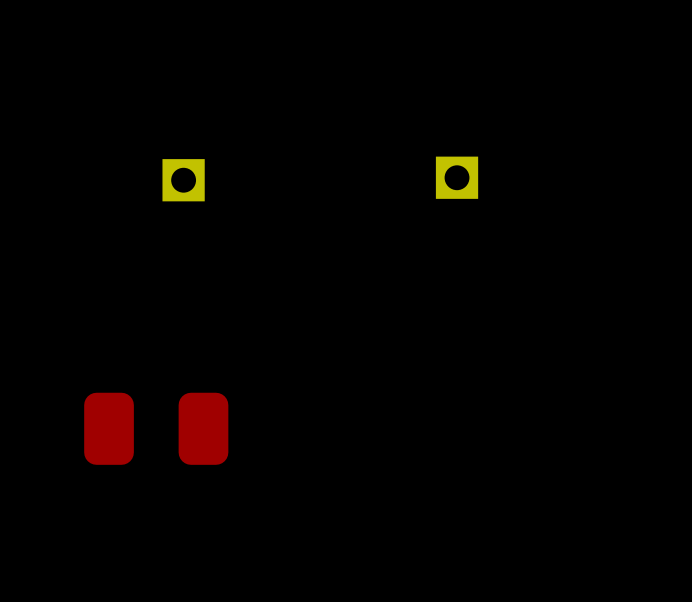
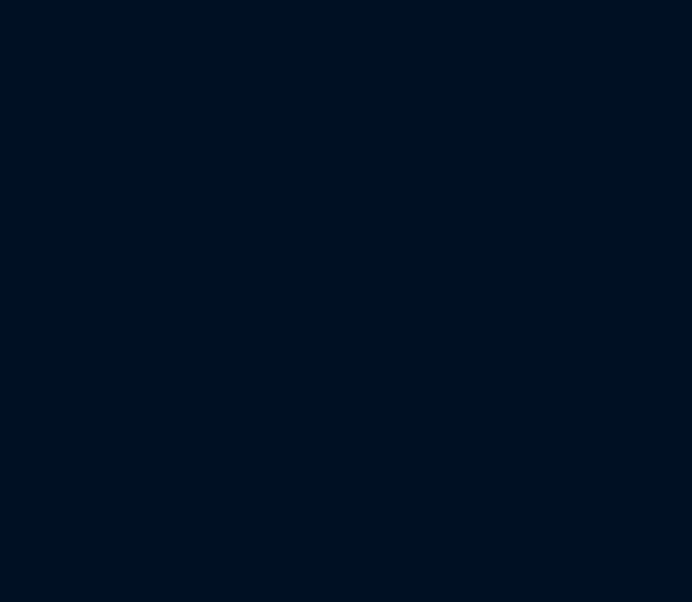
part: (457, 177) -> none
part: (183, 180) -> none
part: (156, 428) -> none

